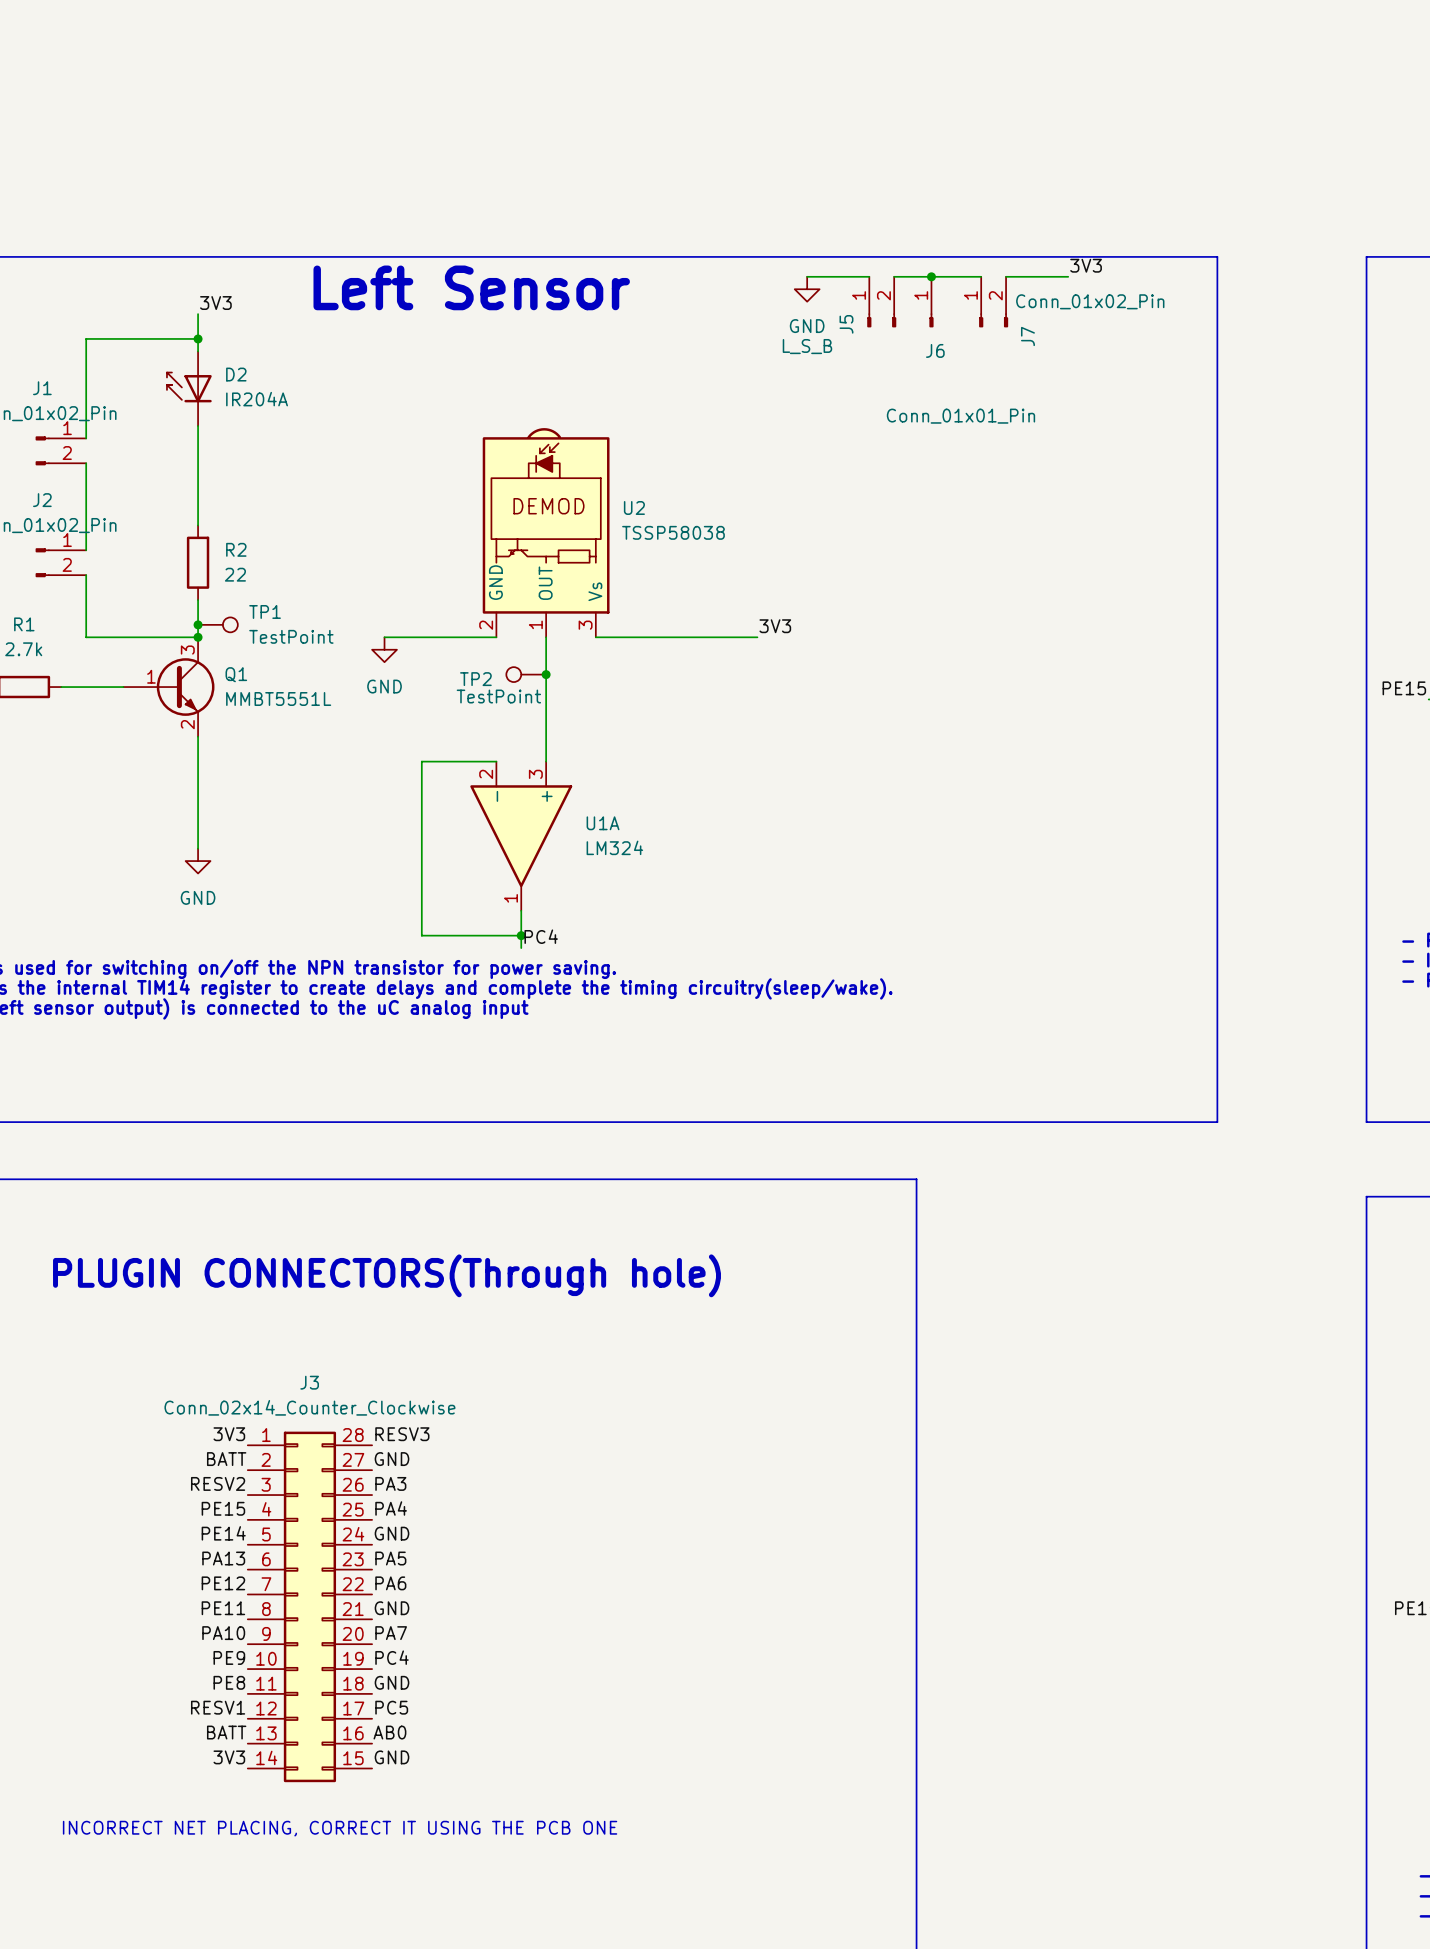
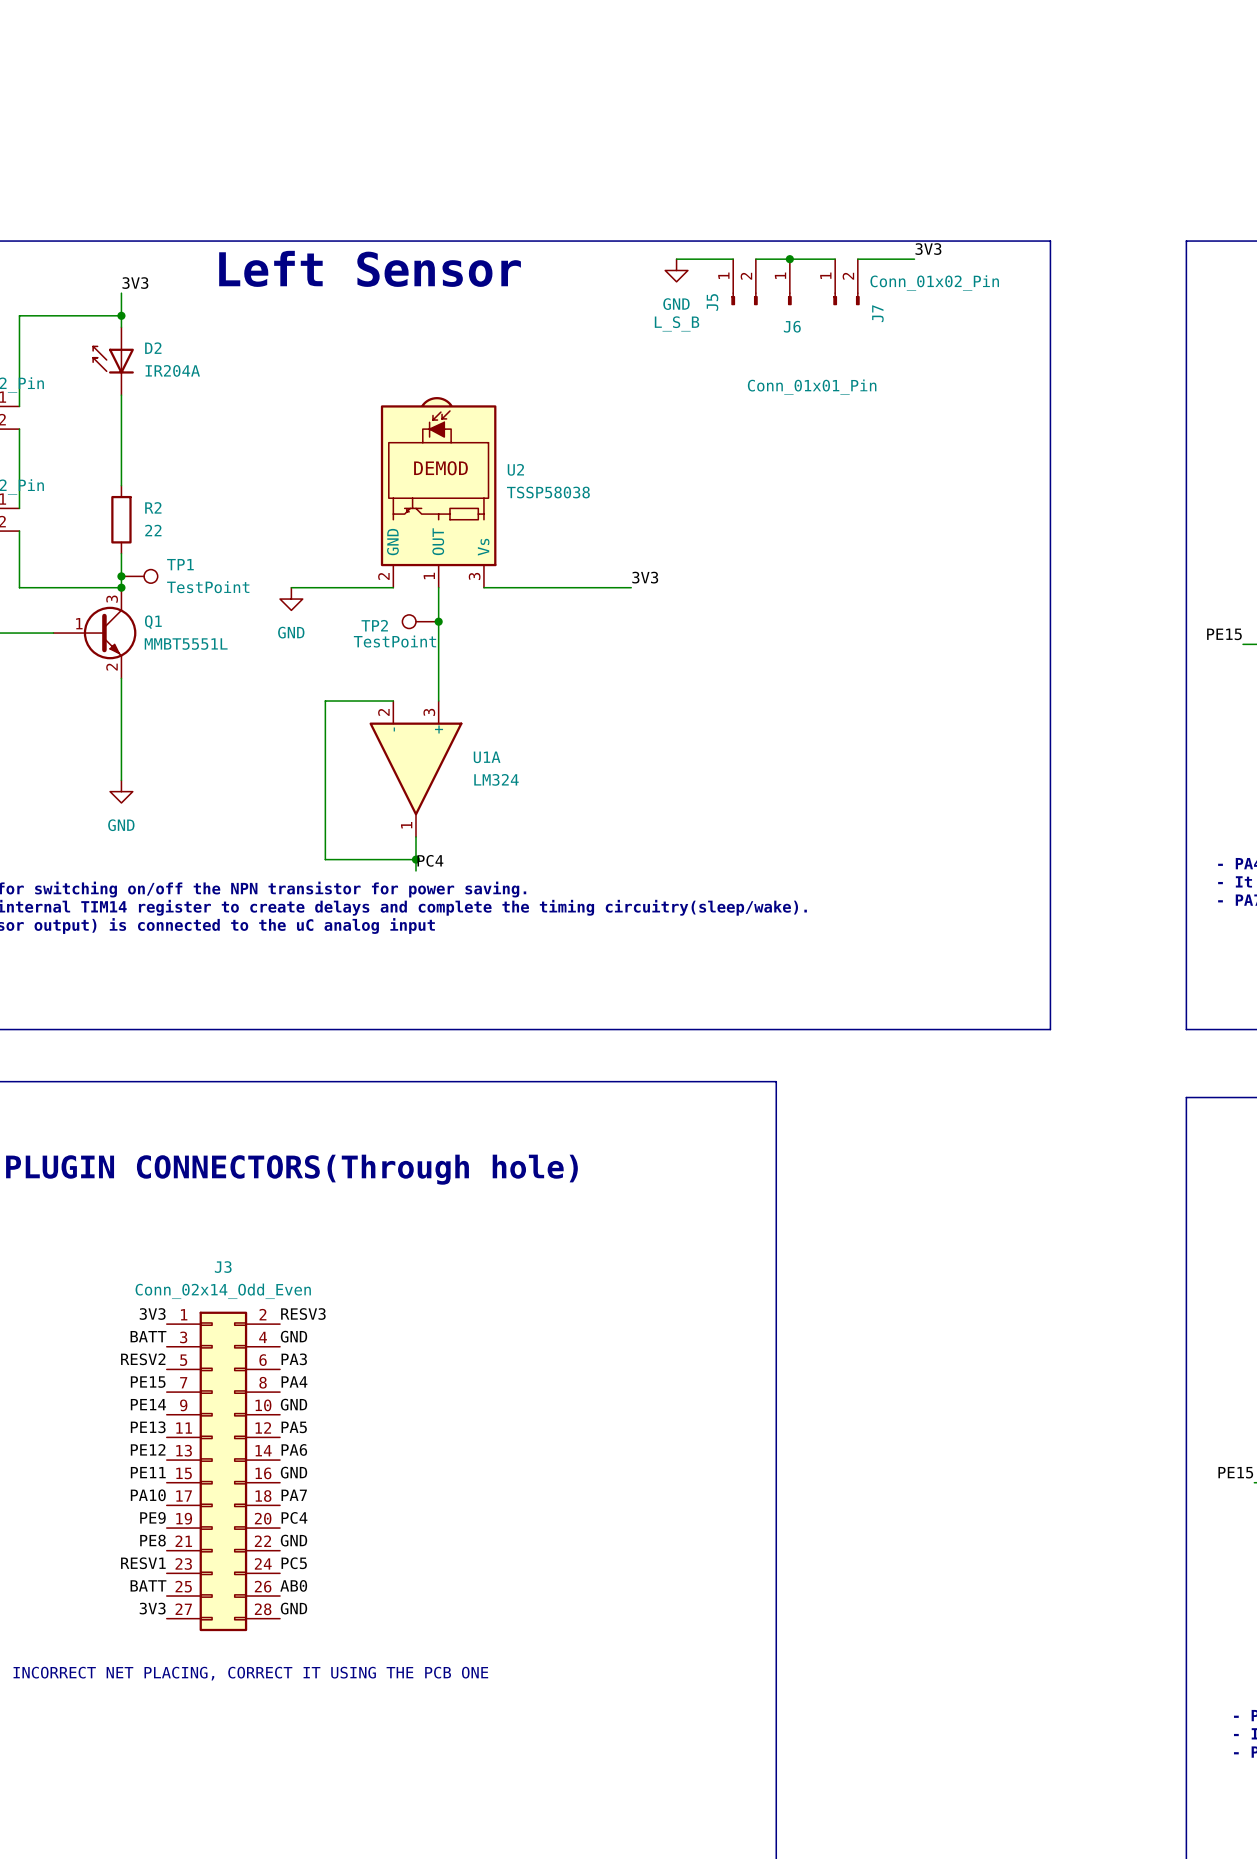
J3 value: Conn_02x14_Counter_Clockwise (309, 1407) -> Conn_02x14_Odd_Even (223, 1291)
J3 symbol: [247, 1431, 373, 1783] -> [166, 1311, 281, 1632]
label: PA13 (223, 1558) -> PE13 (148, 1427)

